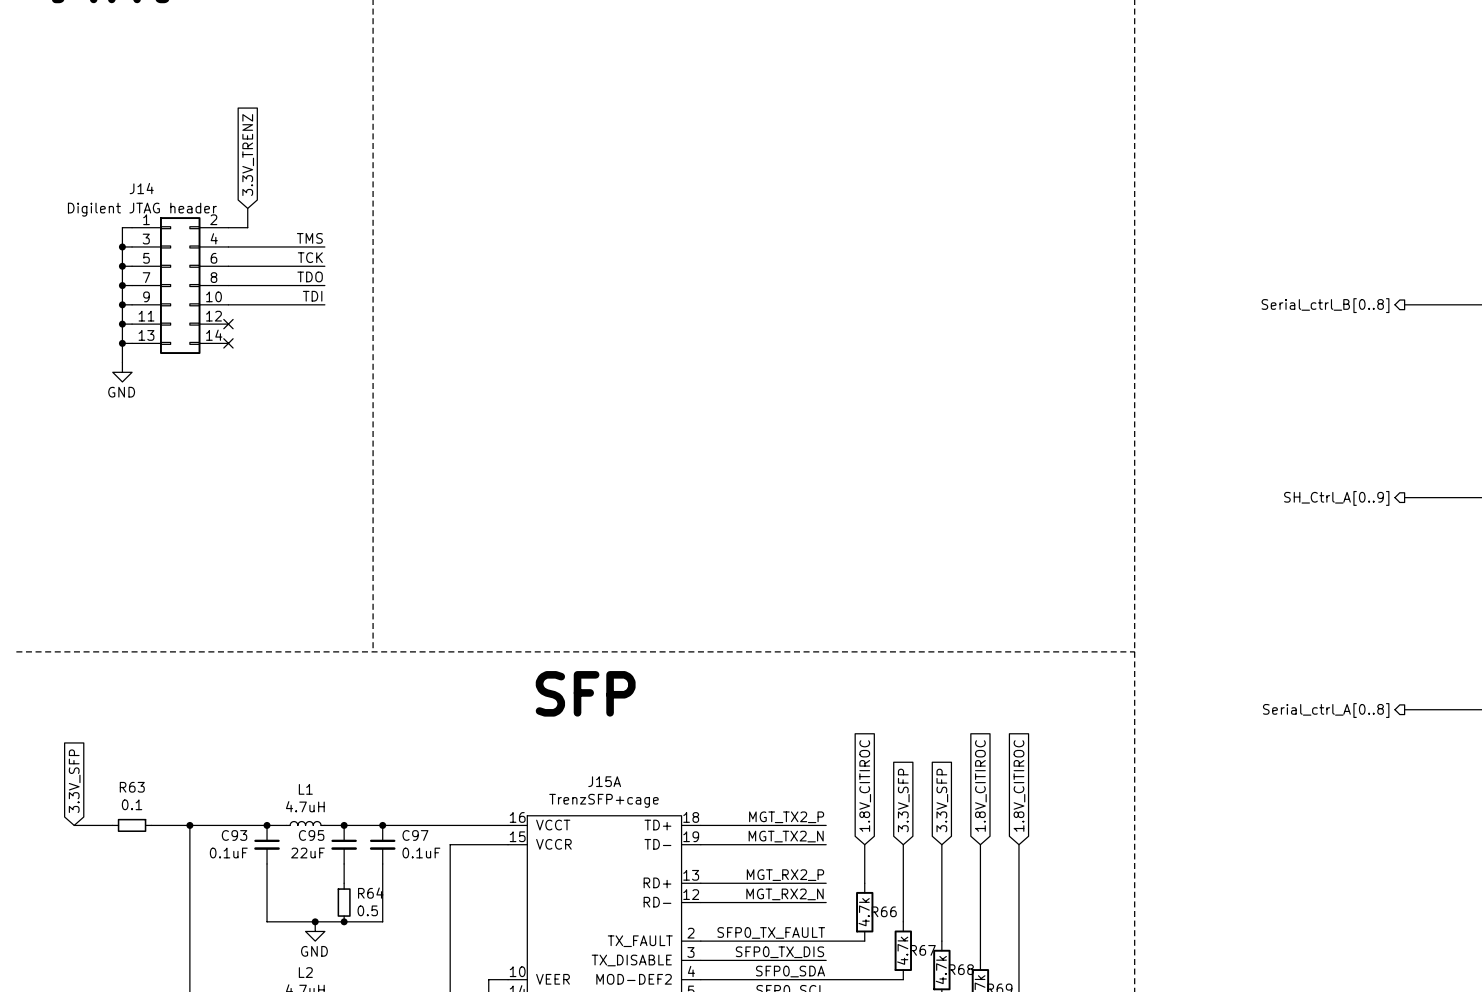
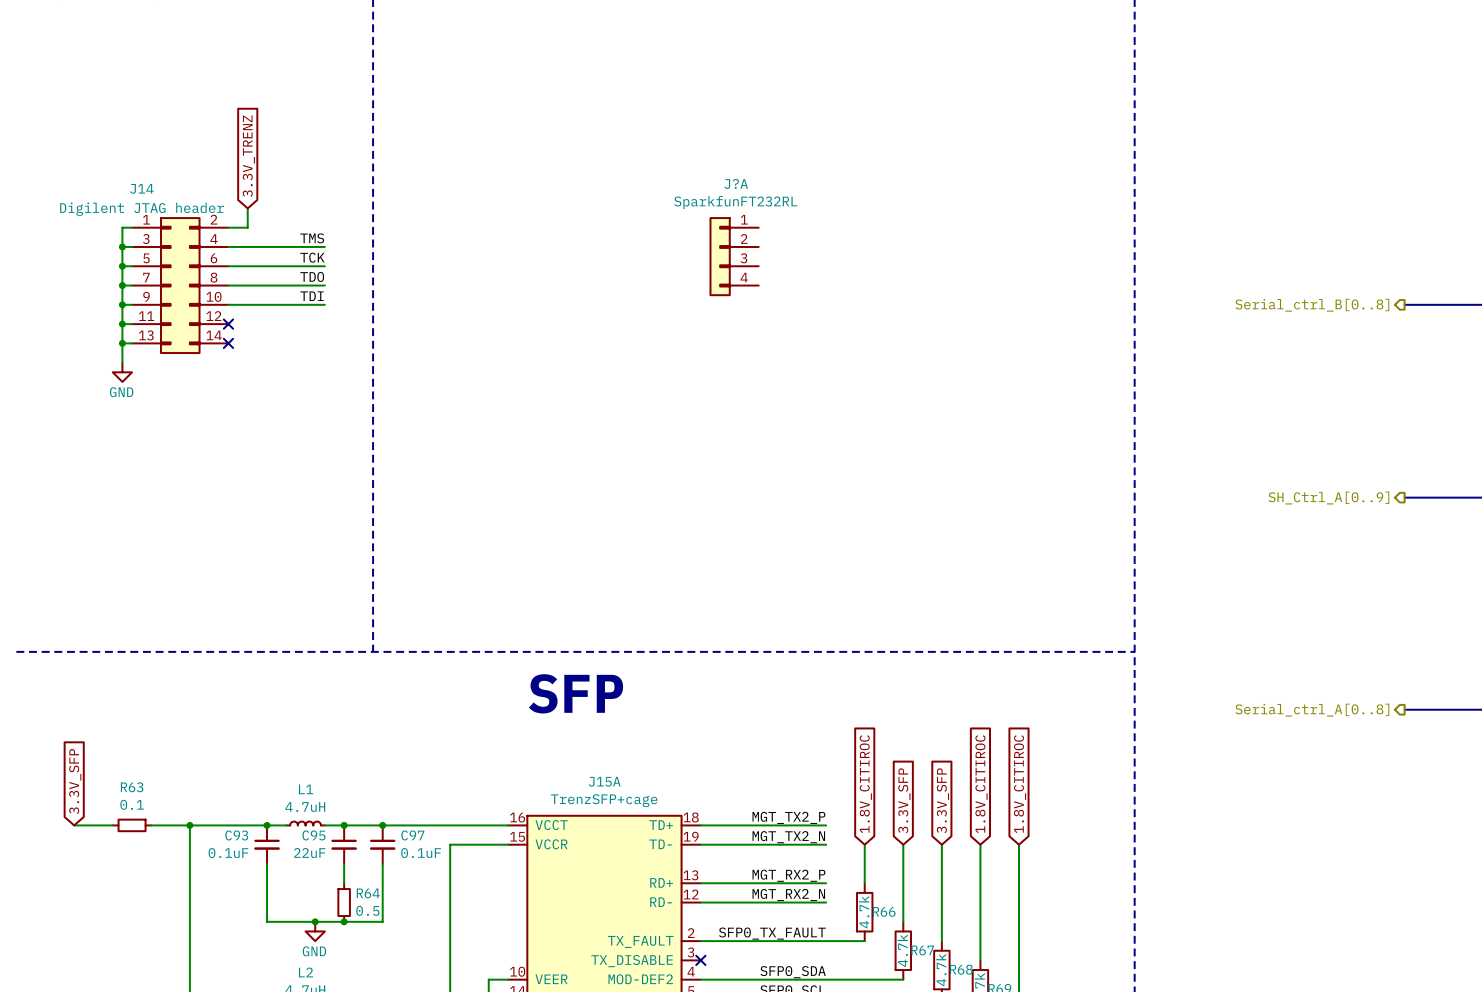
J?A: none -> SparkfunFT232RL (734, 256)
label: SFP0_TX_DIS (779, 952) -> none
wire: (700, 960) (826, 960) -> none
no-connect mark: none -> (700, 960)

